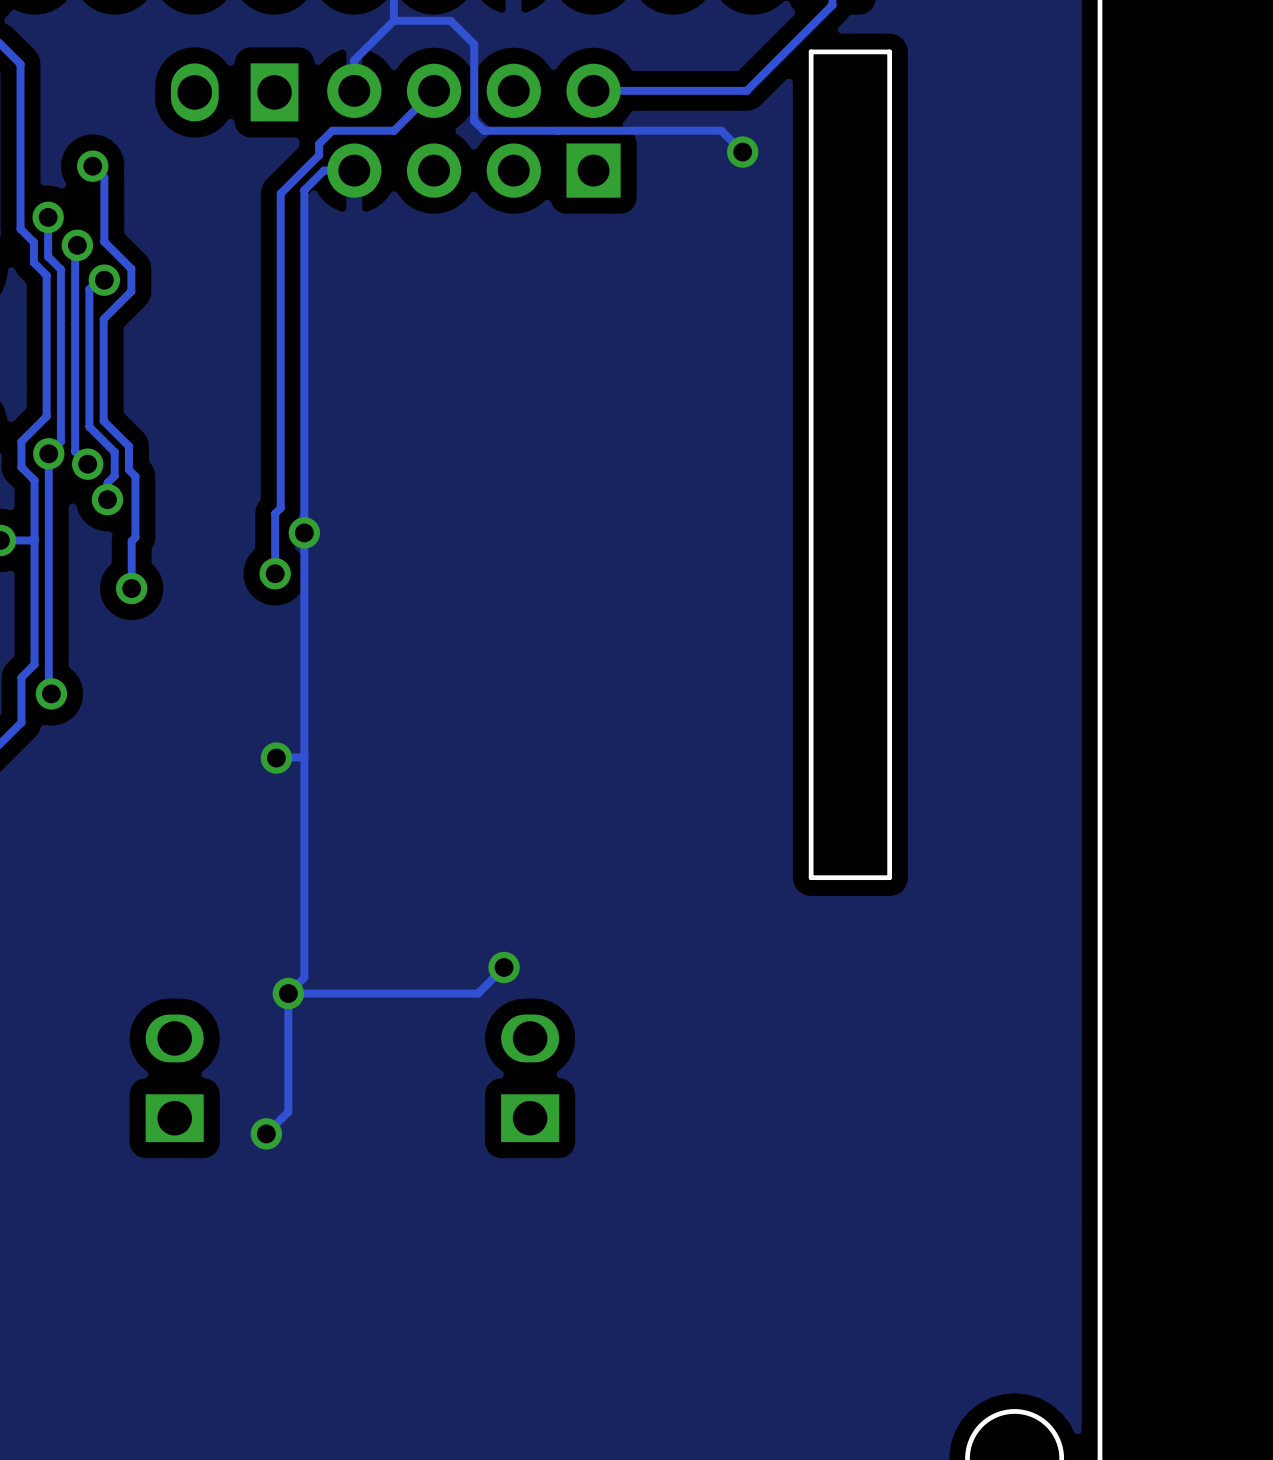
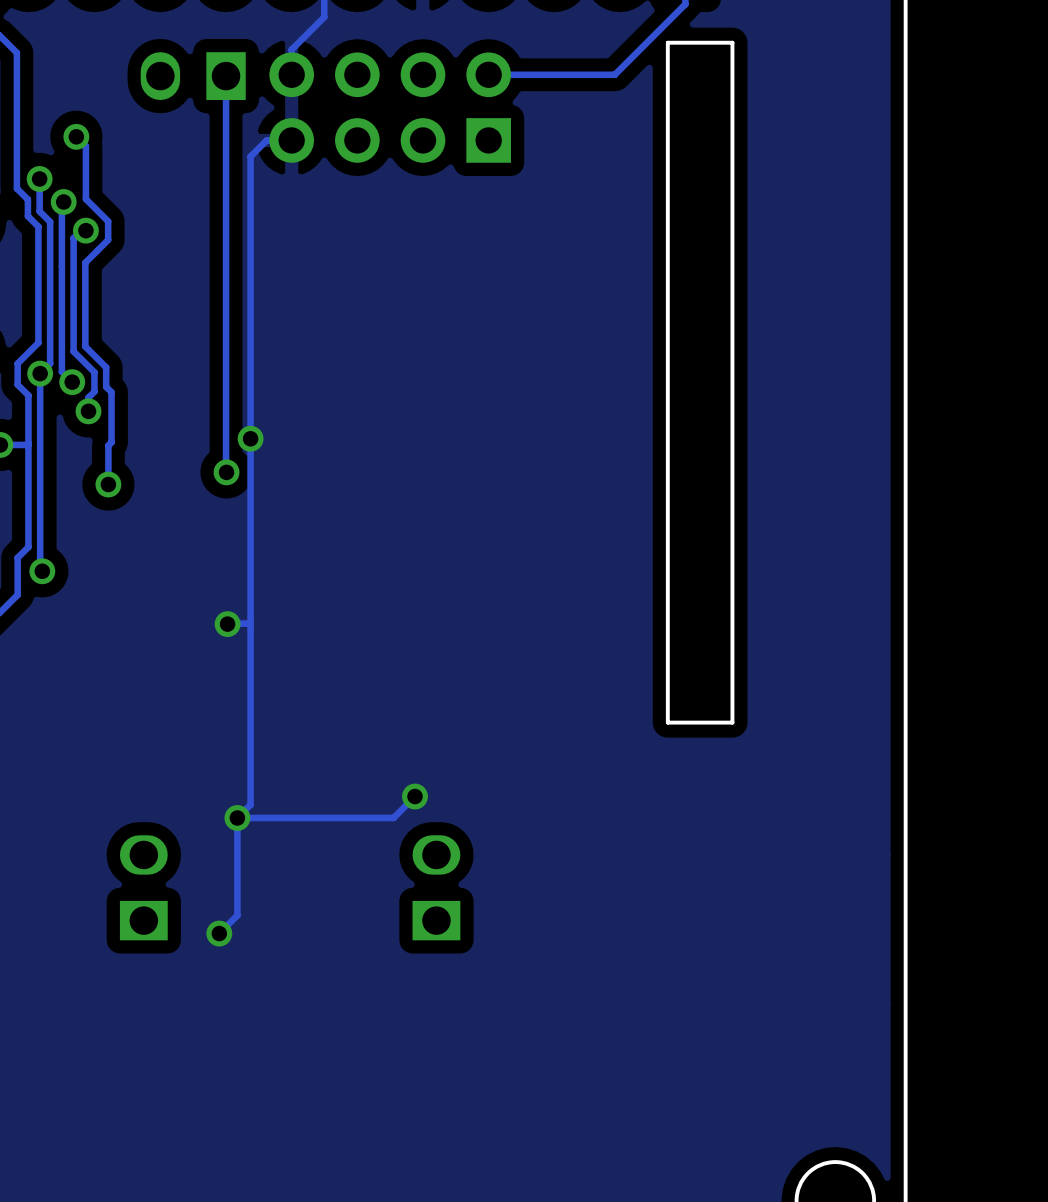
track: (393, 20) (450, 20) (474, 44) (474, 120) (483, 130) (721, 130) (742, 152) -> none
track: (434, 90) (394, 130) (332, 130) (319, 143) (319, 155) (280, 193) (280, 508) (275, 513) (275, 573) -> (226, 76) (226, 471)
via: (742, 152) -> none

